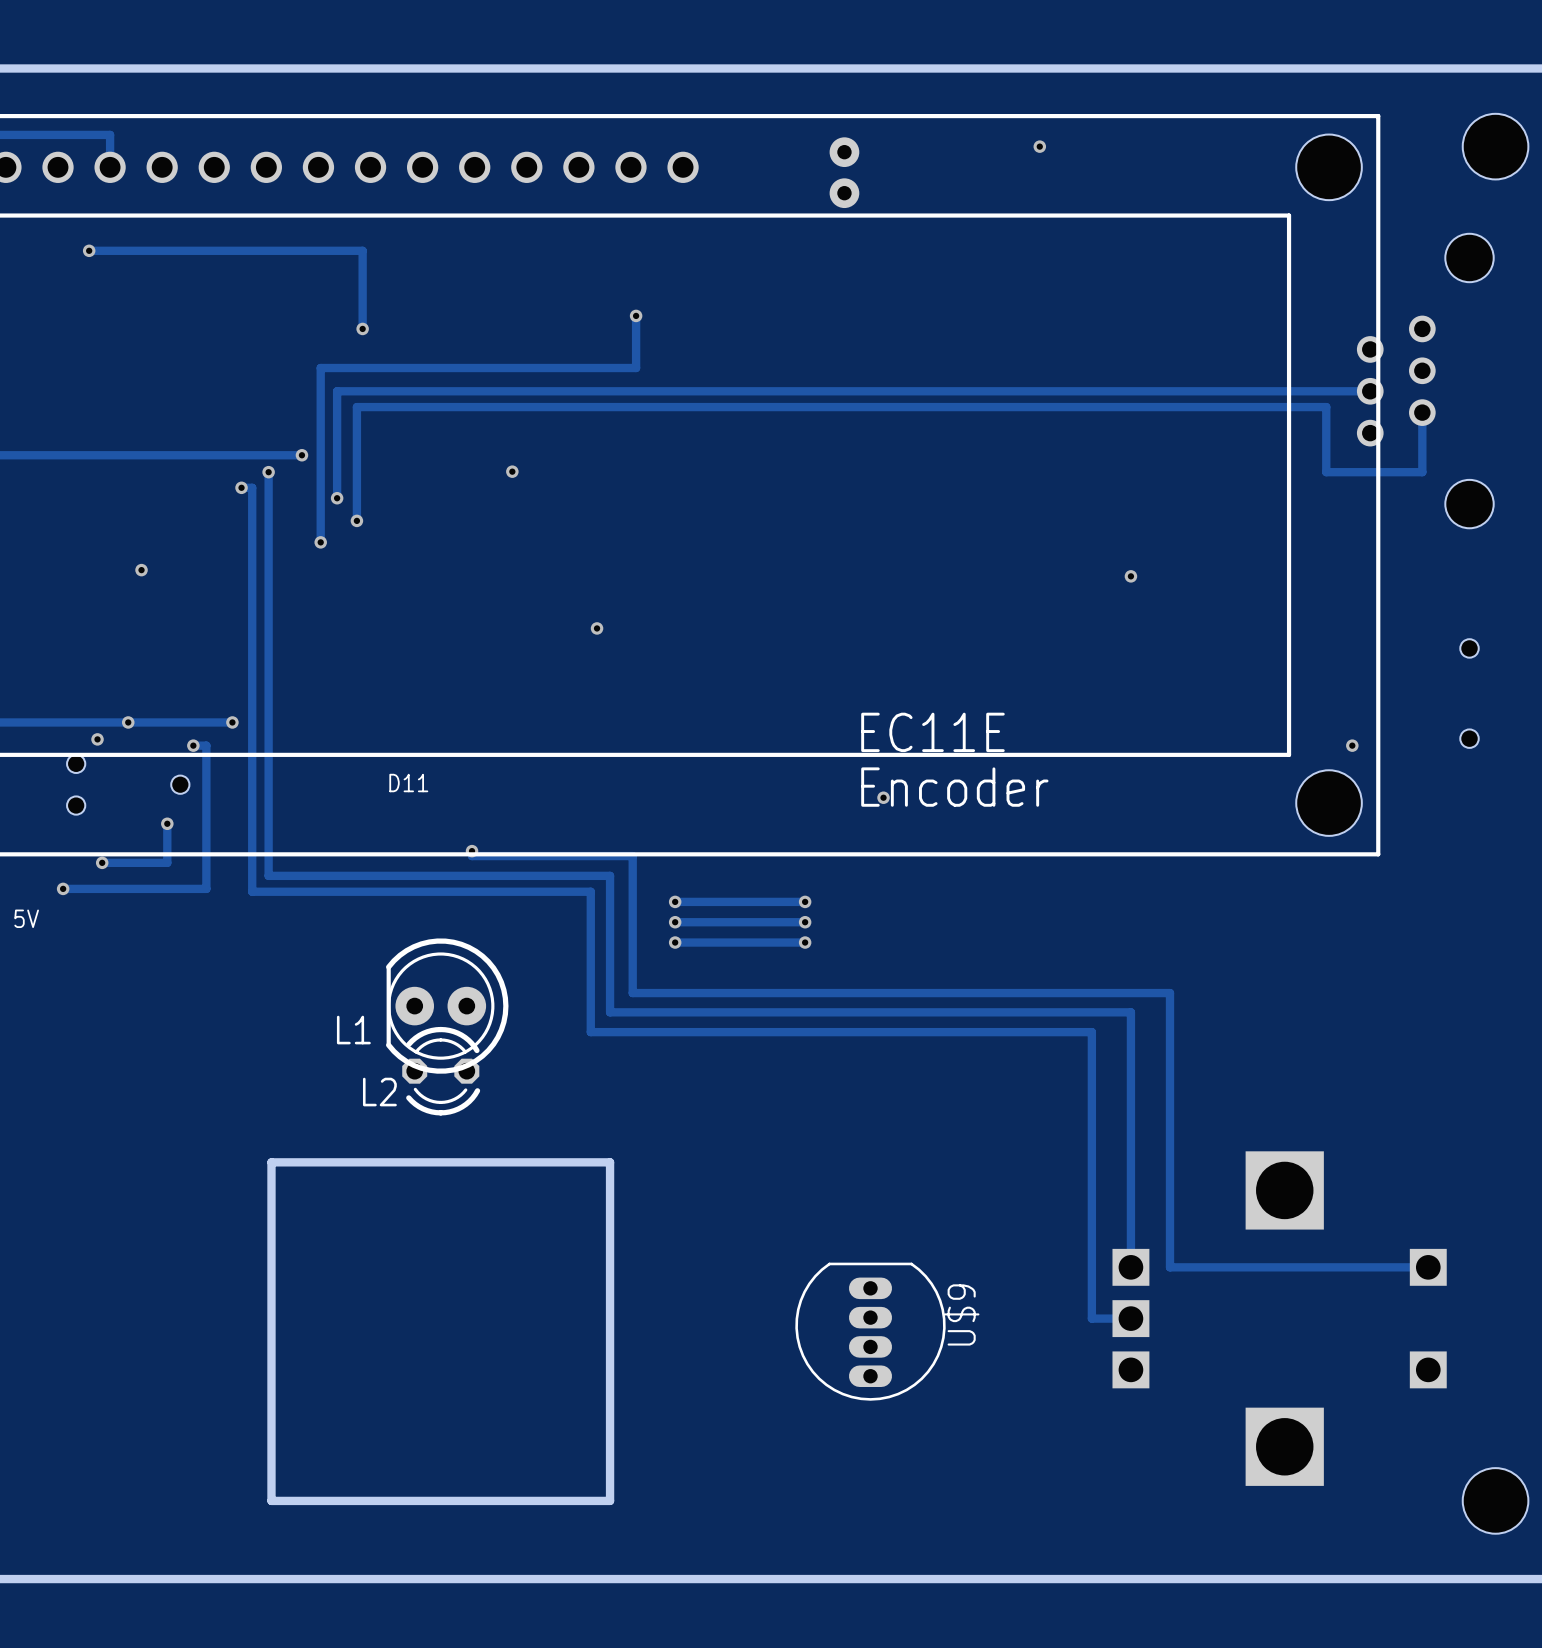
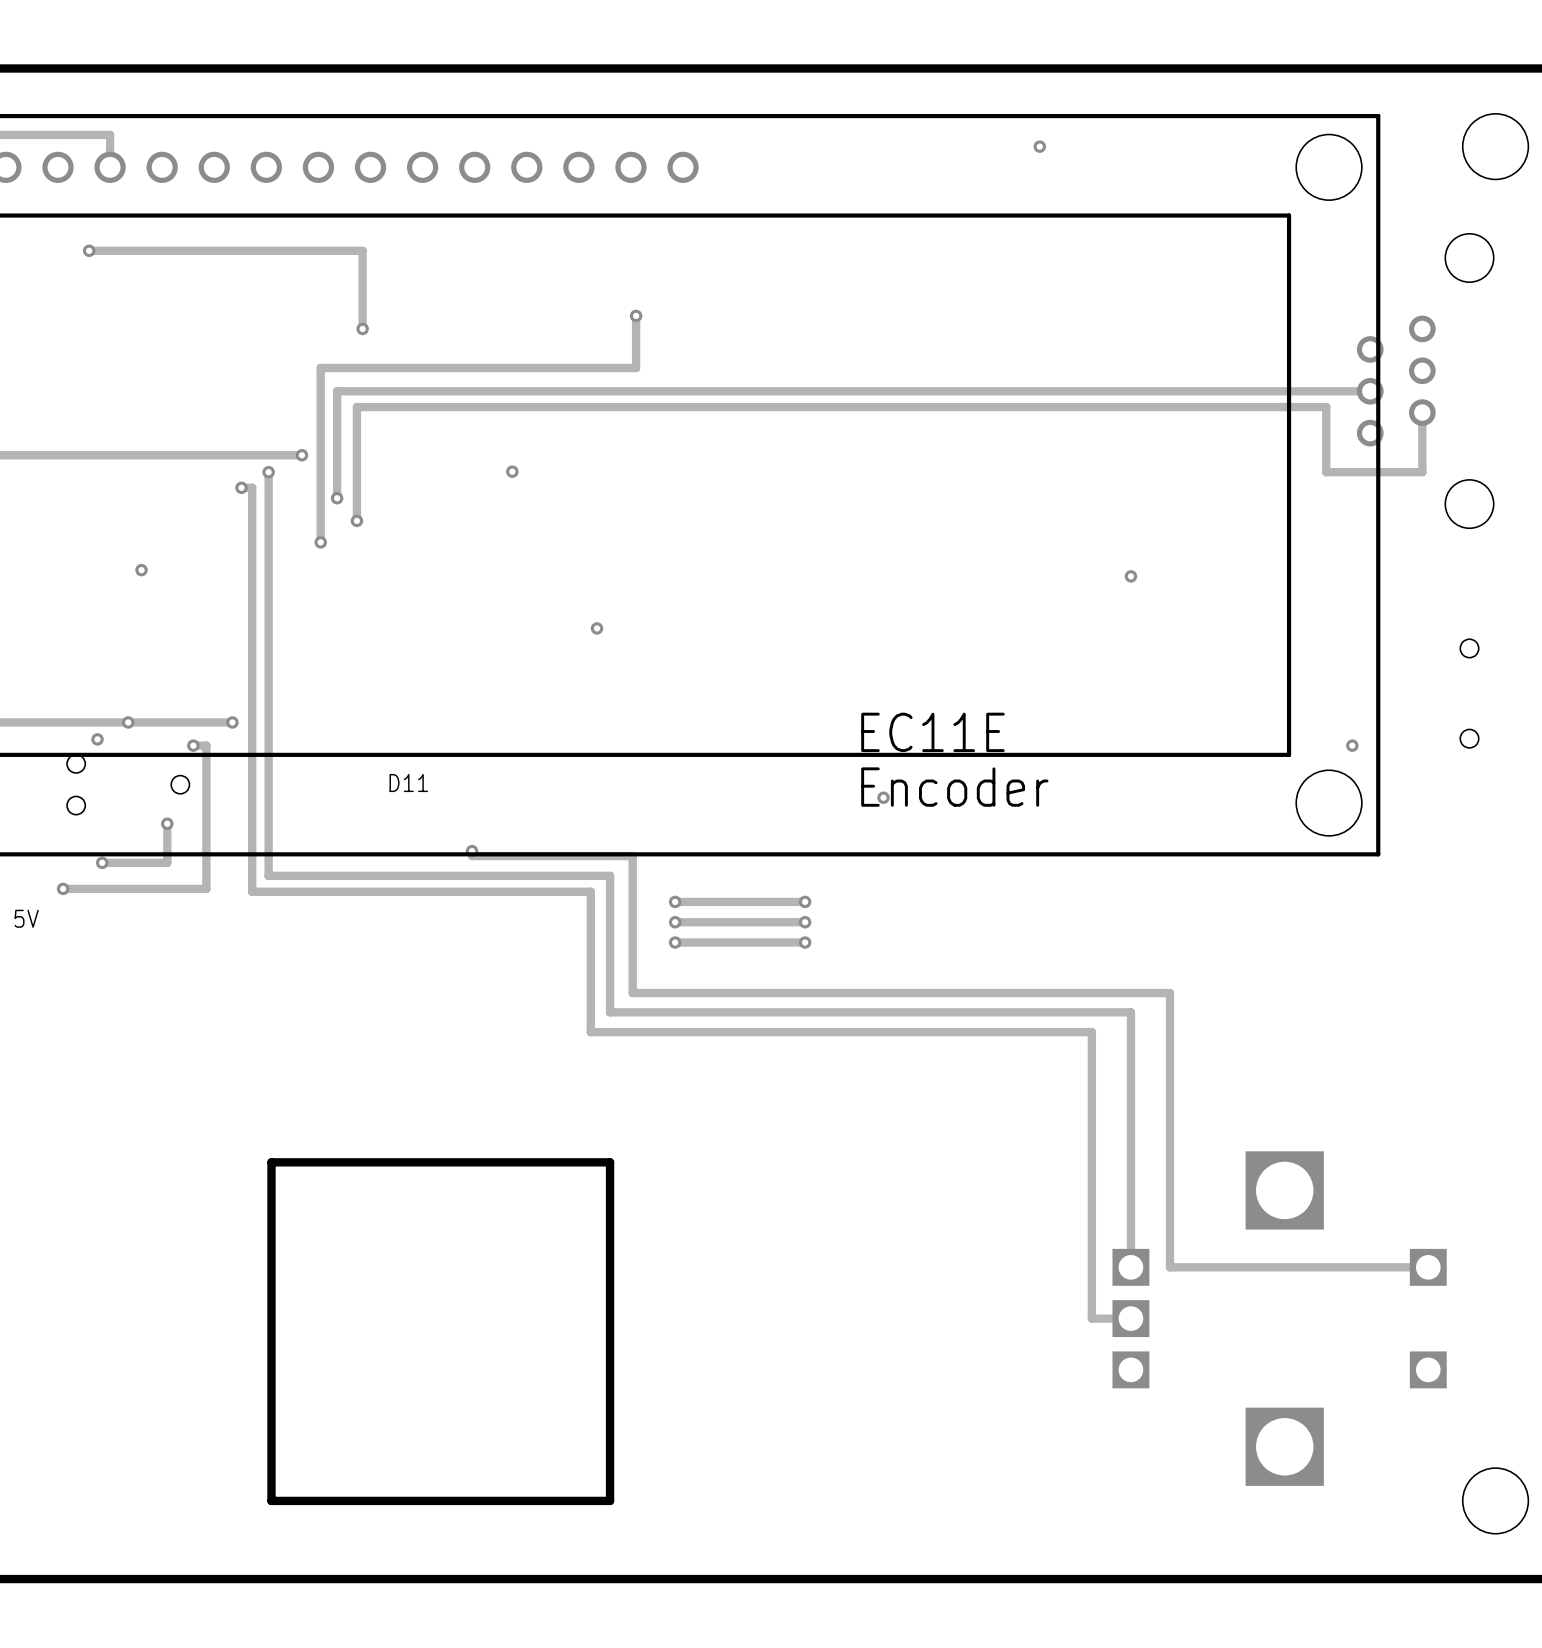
part: (844, 172) -> none
L1: (447, 1006) -> none
L2: (441, 1071) -> none
U$9: (870, 1331) -> none

